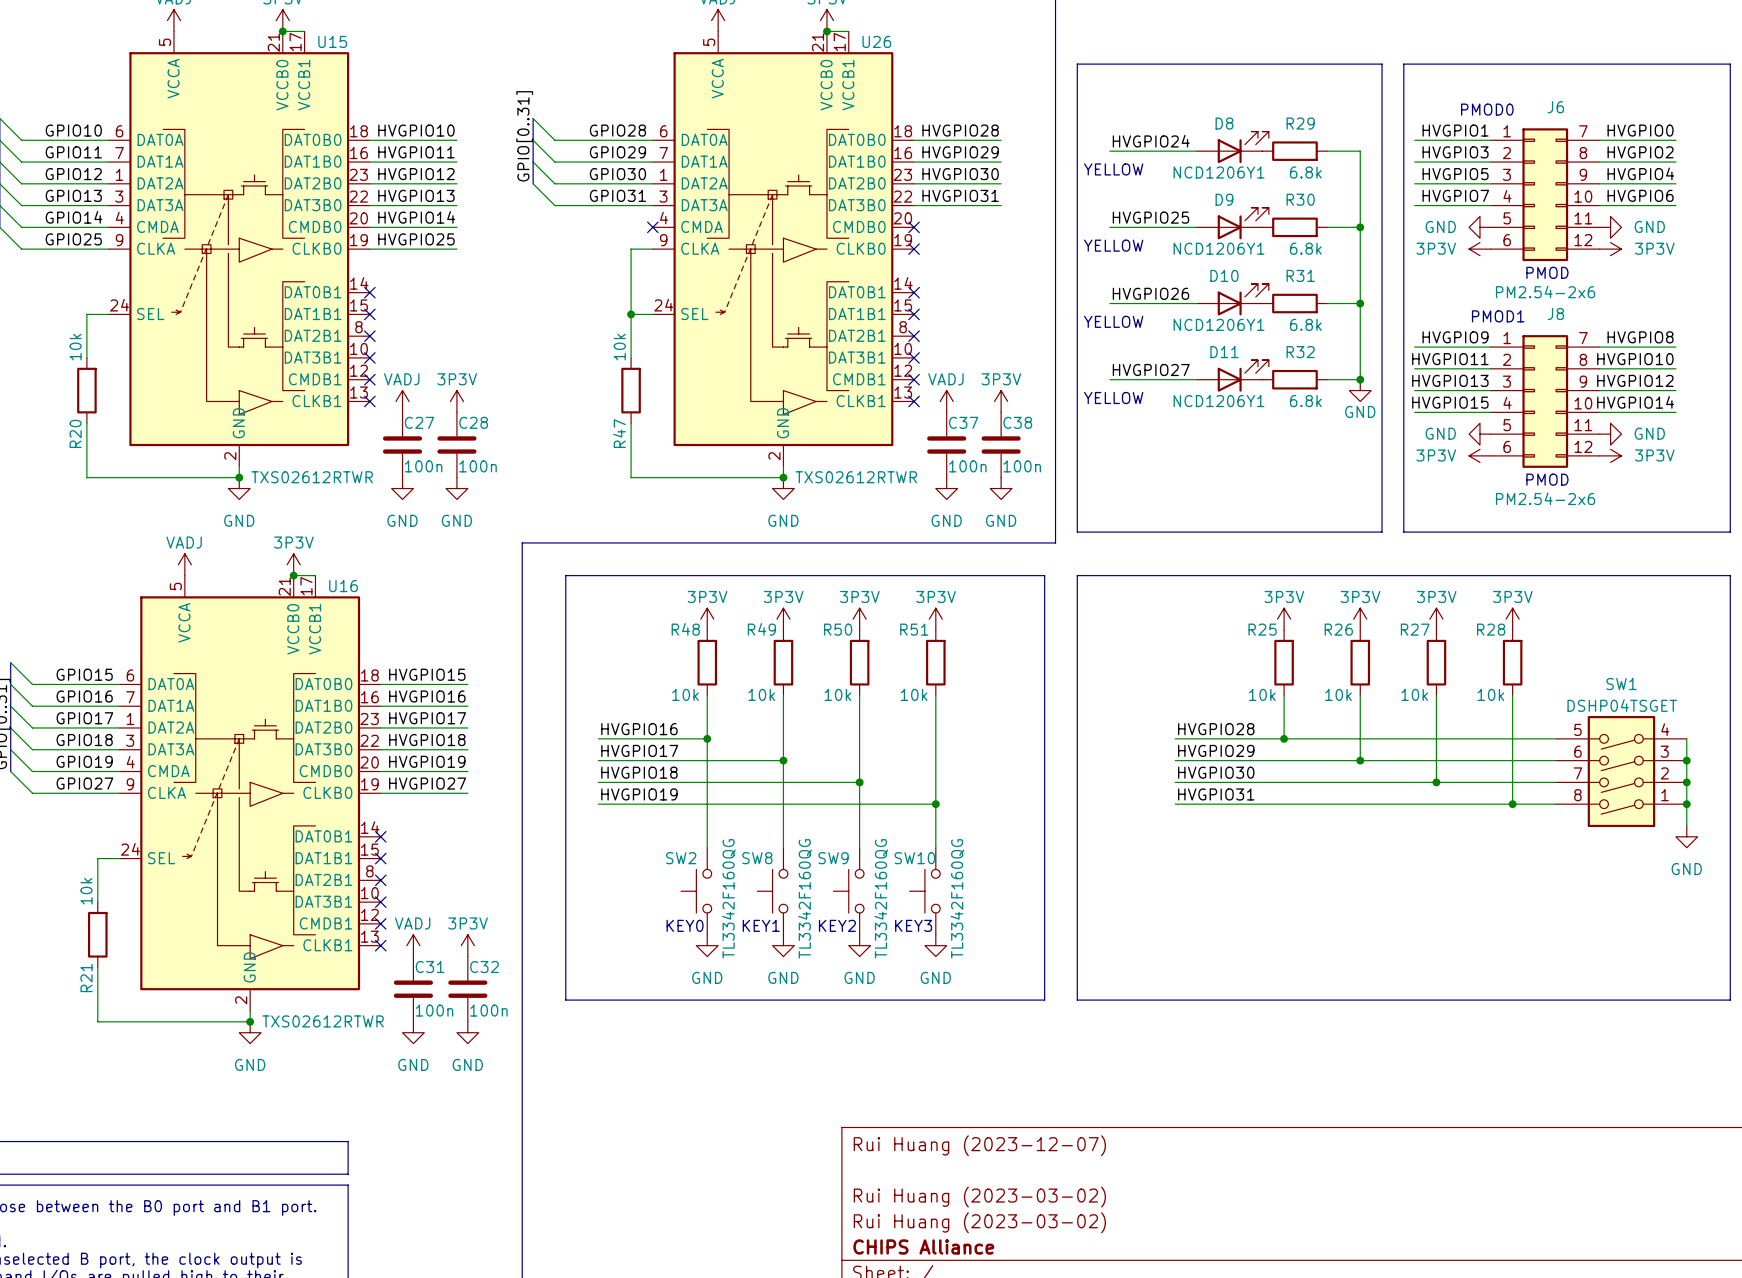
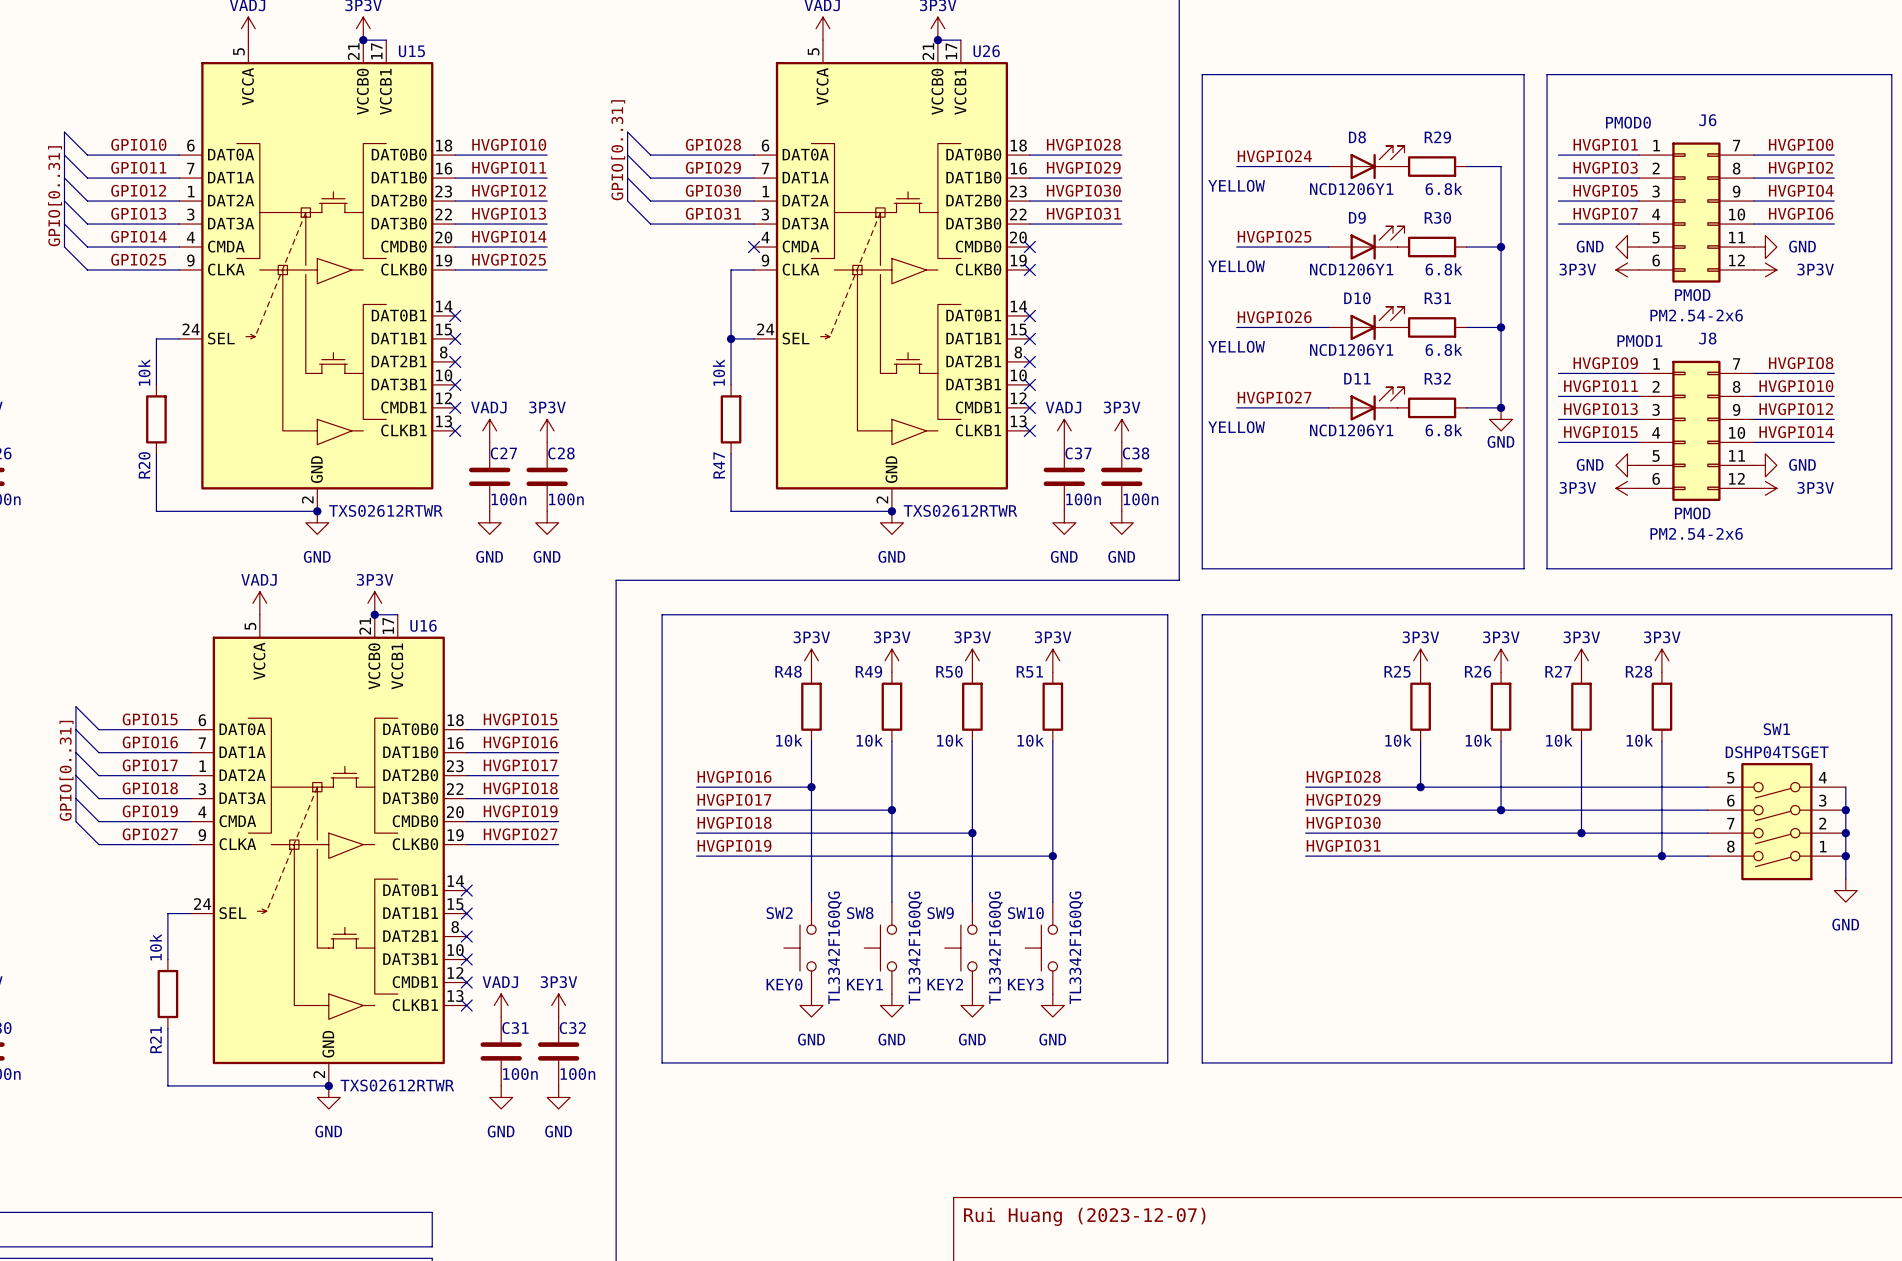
U15 symbol: [108, 31, 370, 467] -> [179, 40, 456, 512]
U26 symbol: [652, 31, 915, 467] -> [754, 40, 1030, 512]
U16 symbol: [119, 575, 381, 1011] -> [190, 614, 467, 1086]

